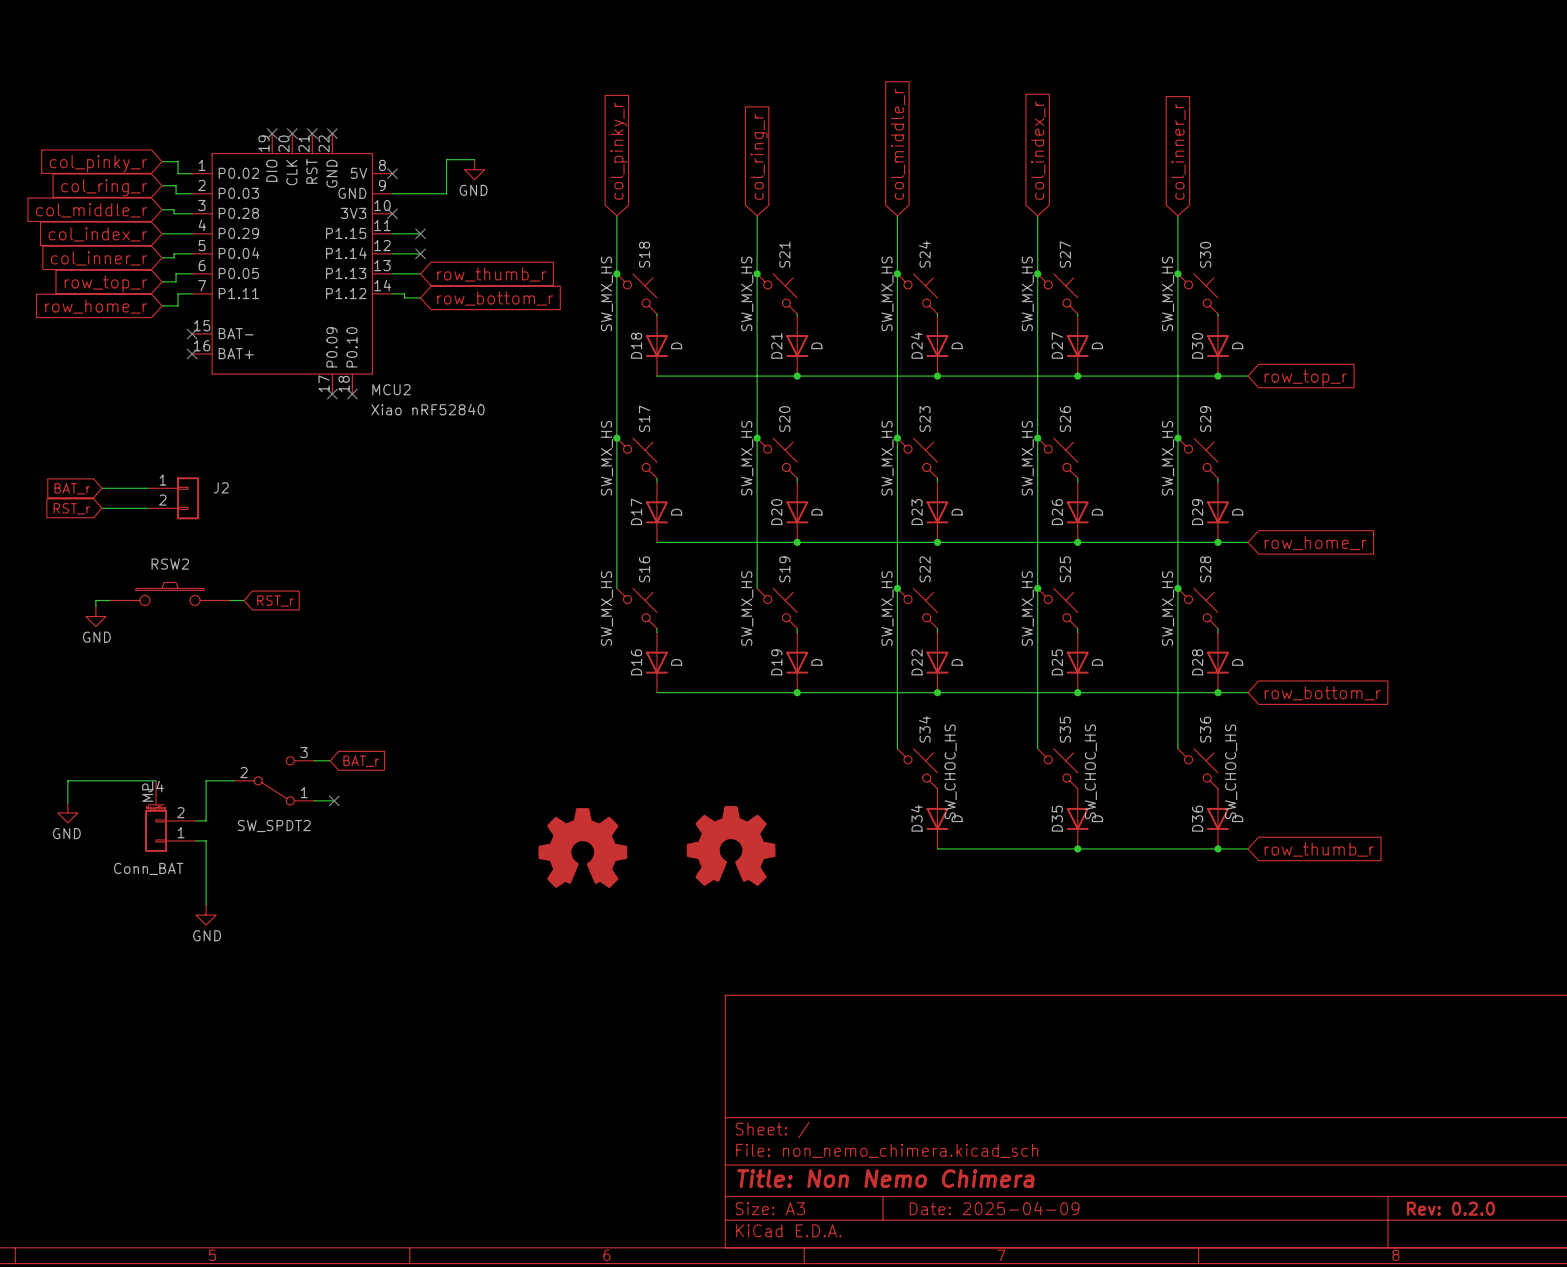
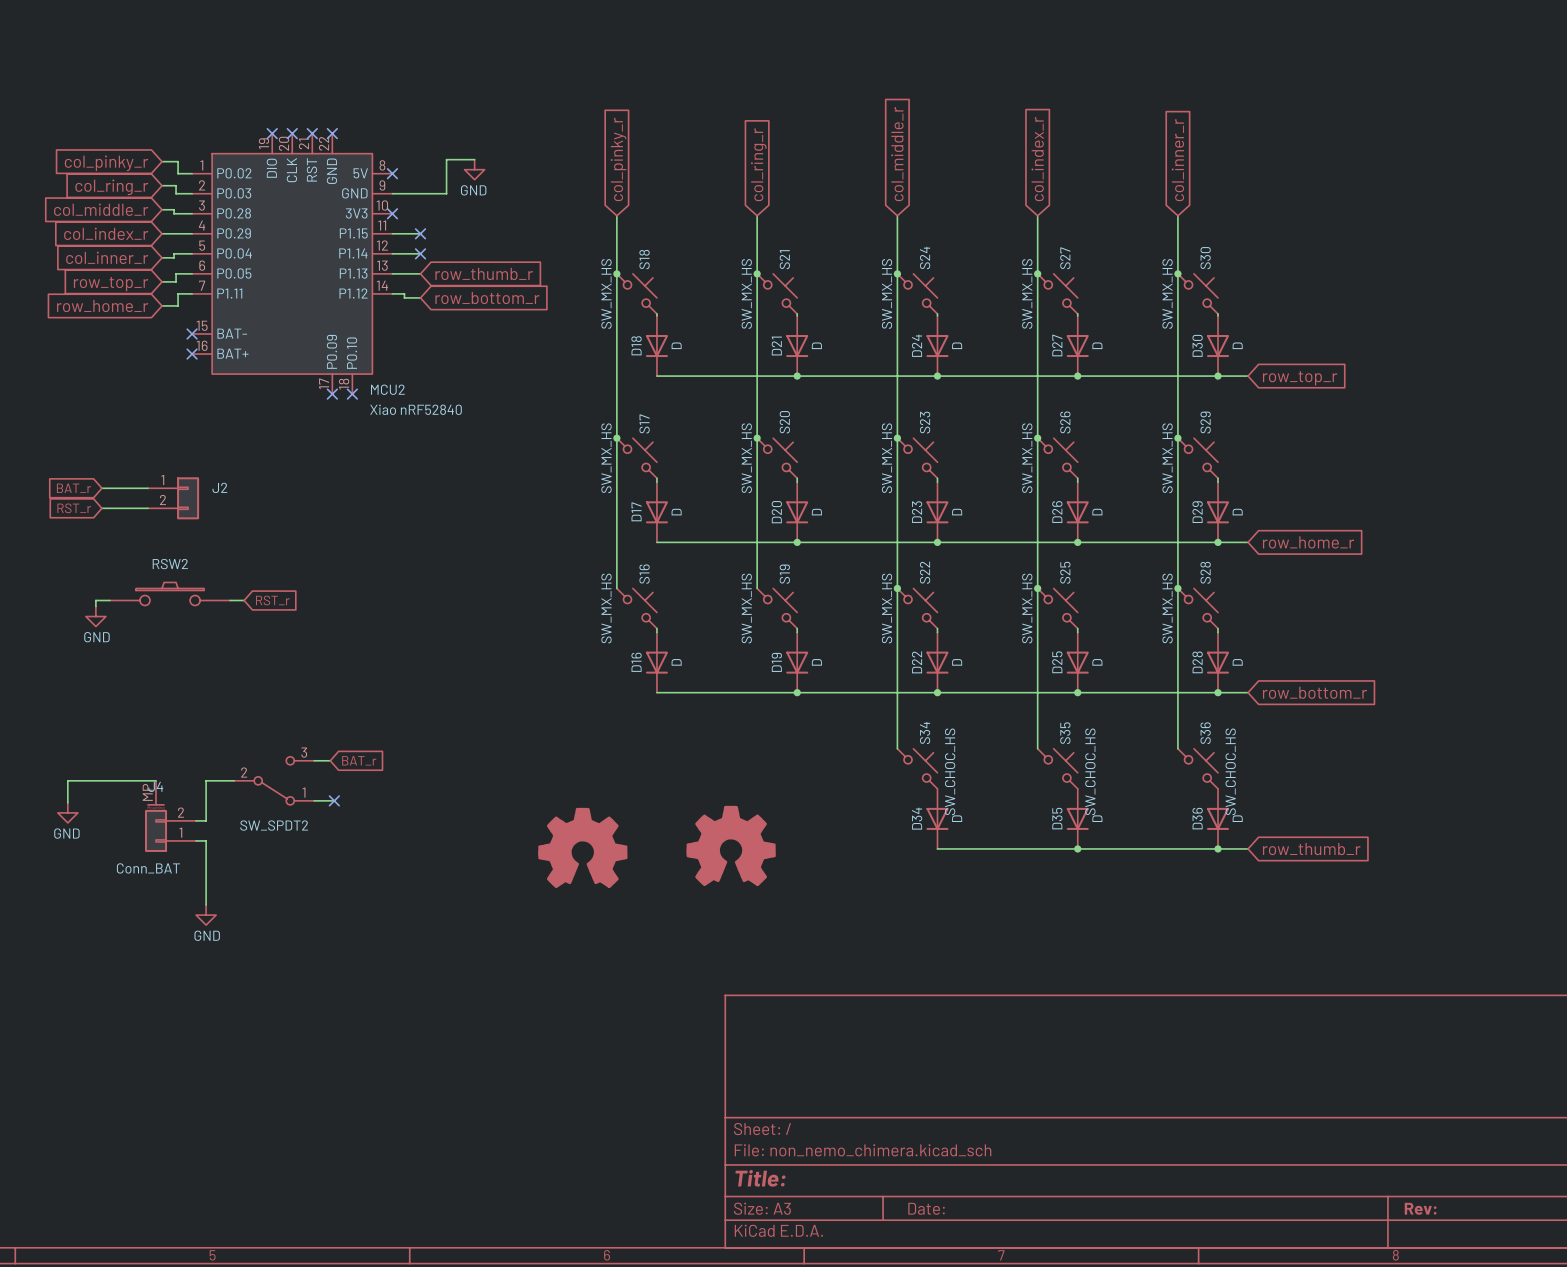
title block: Title: Non Nemo Chimera (885, 1178) -> Title: (760, 1178)
title block: Date: 2025-04-09 (994, 1208) -> Date: (926, 1208)
title block: Rev: 0.2.0 (1450, 1208) -> Rev: (1420, 1208)

